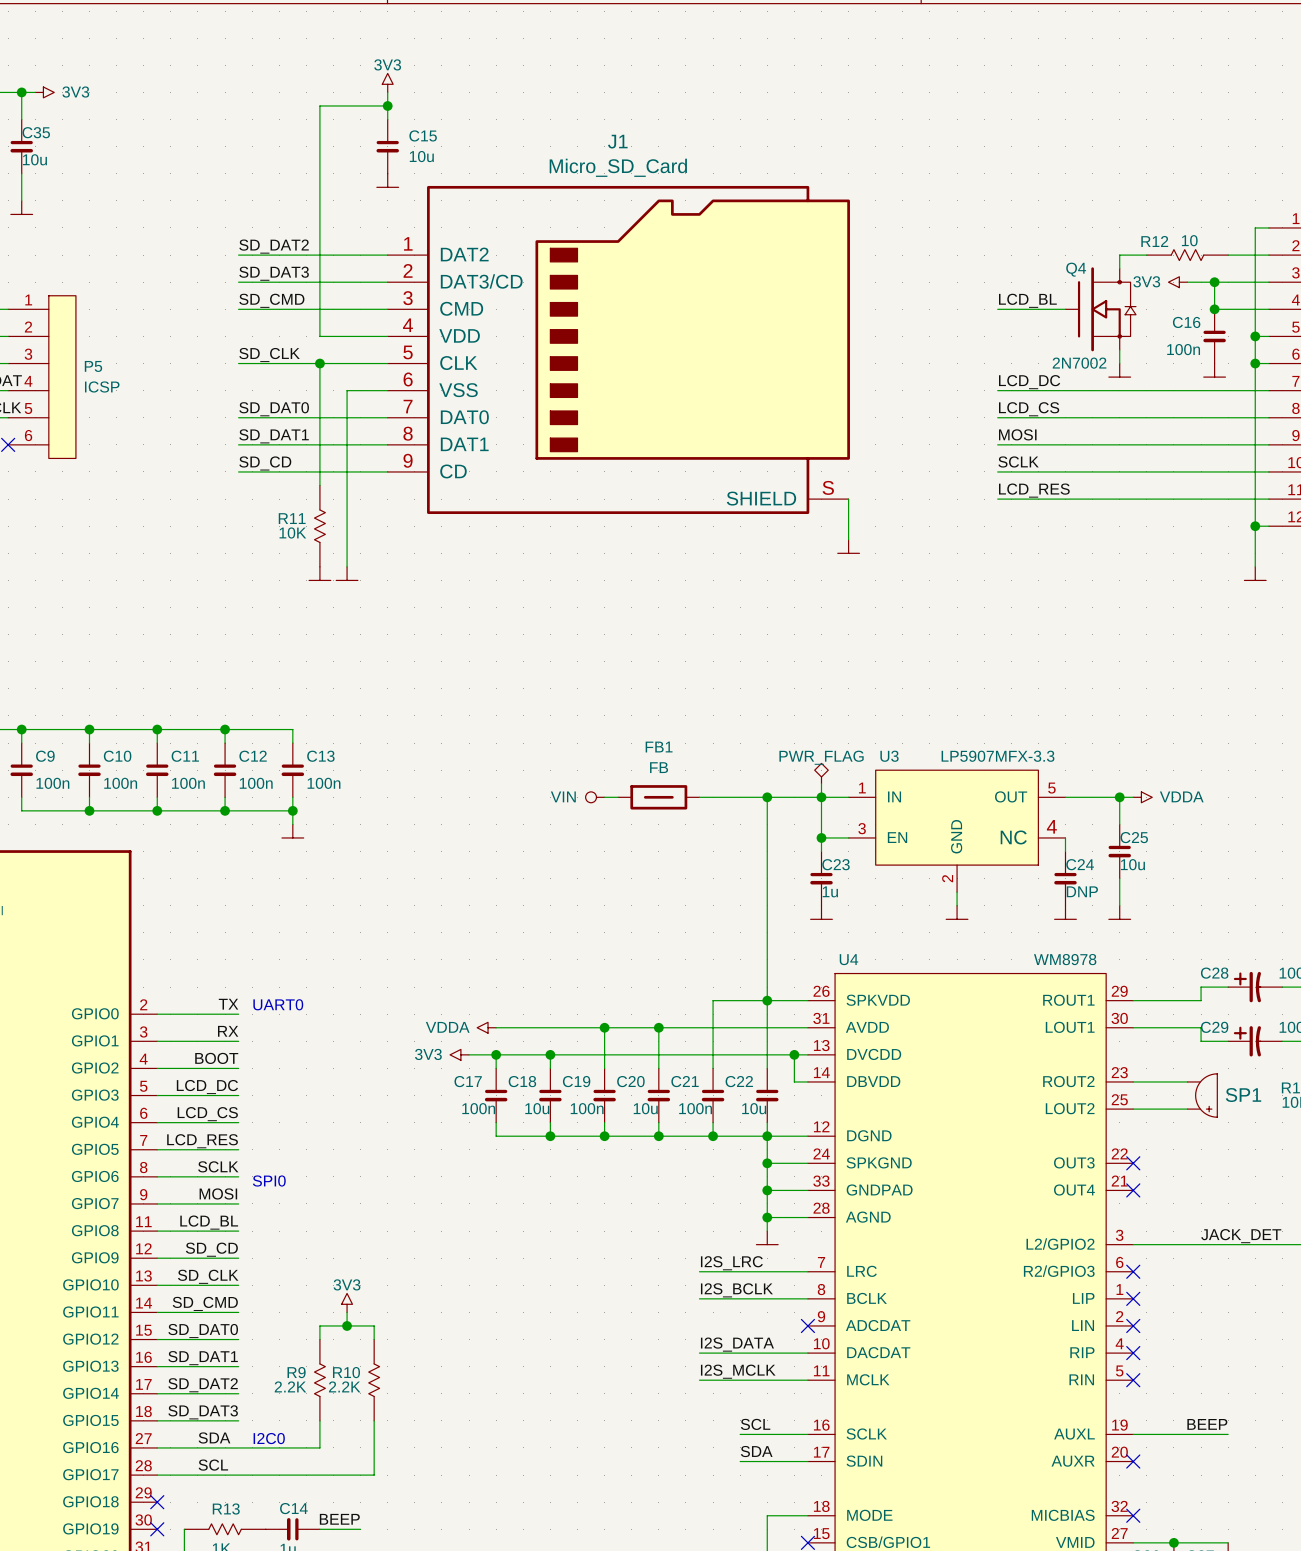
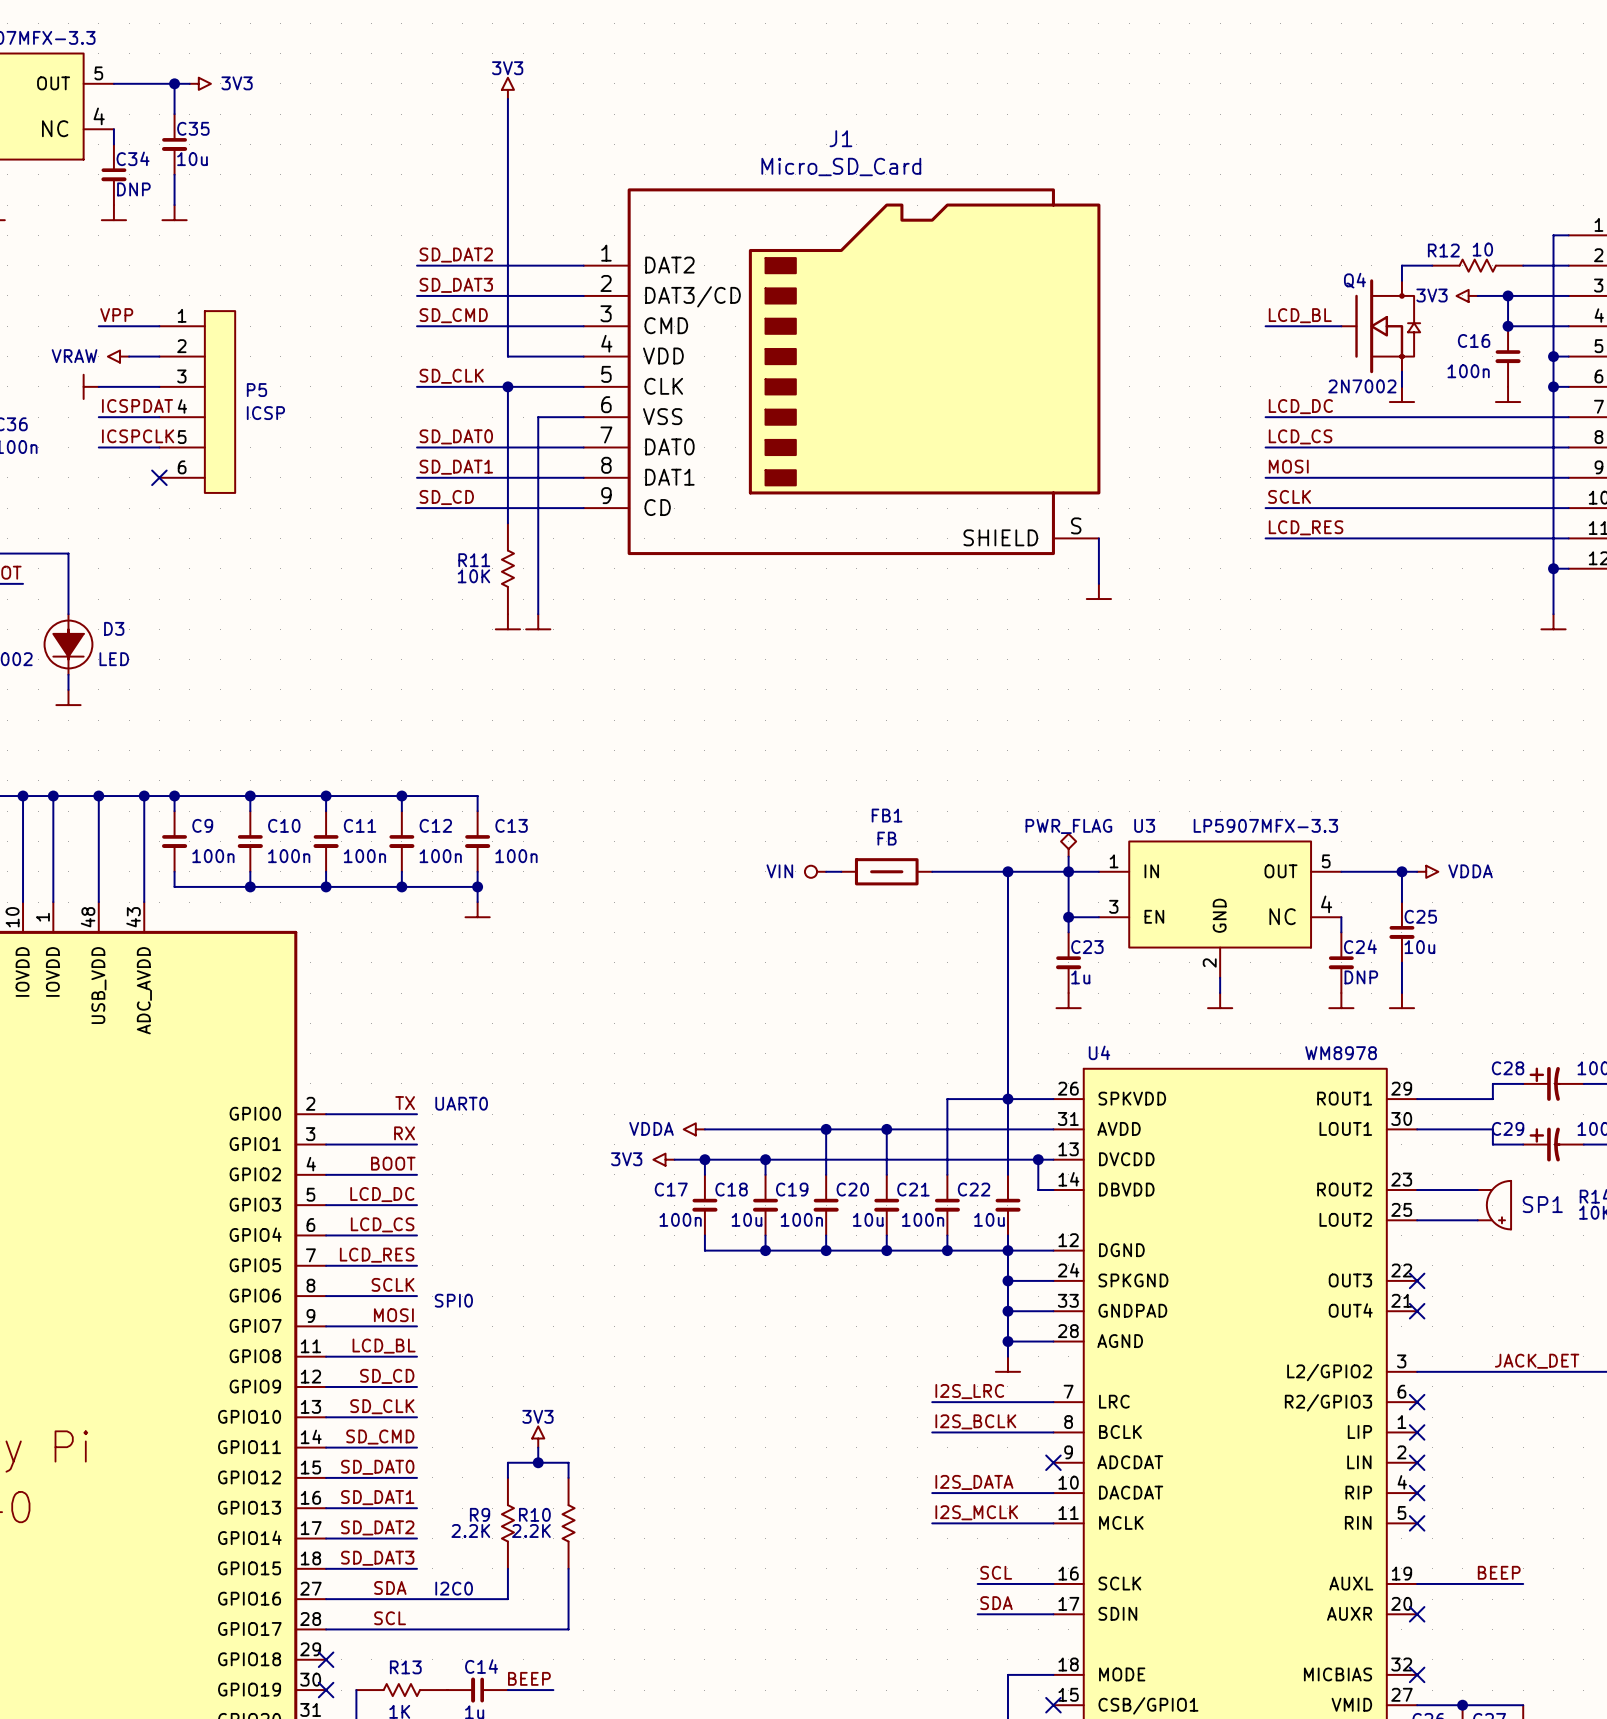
power symbol position: 3V3 (387, 82) -> 3V3 (507, 88)
wire: (387, 92) (387, 119) -> none
wire: (319, 105) (387, 105) -> none
junction: (387, 105) -> none
C15: 10u (387, 146) -> none
power symbol: (387, 180) -> none

